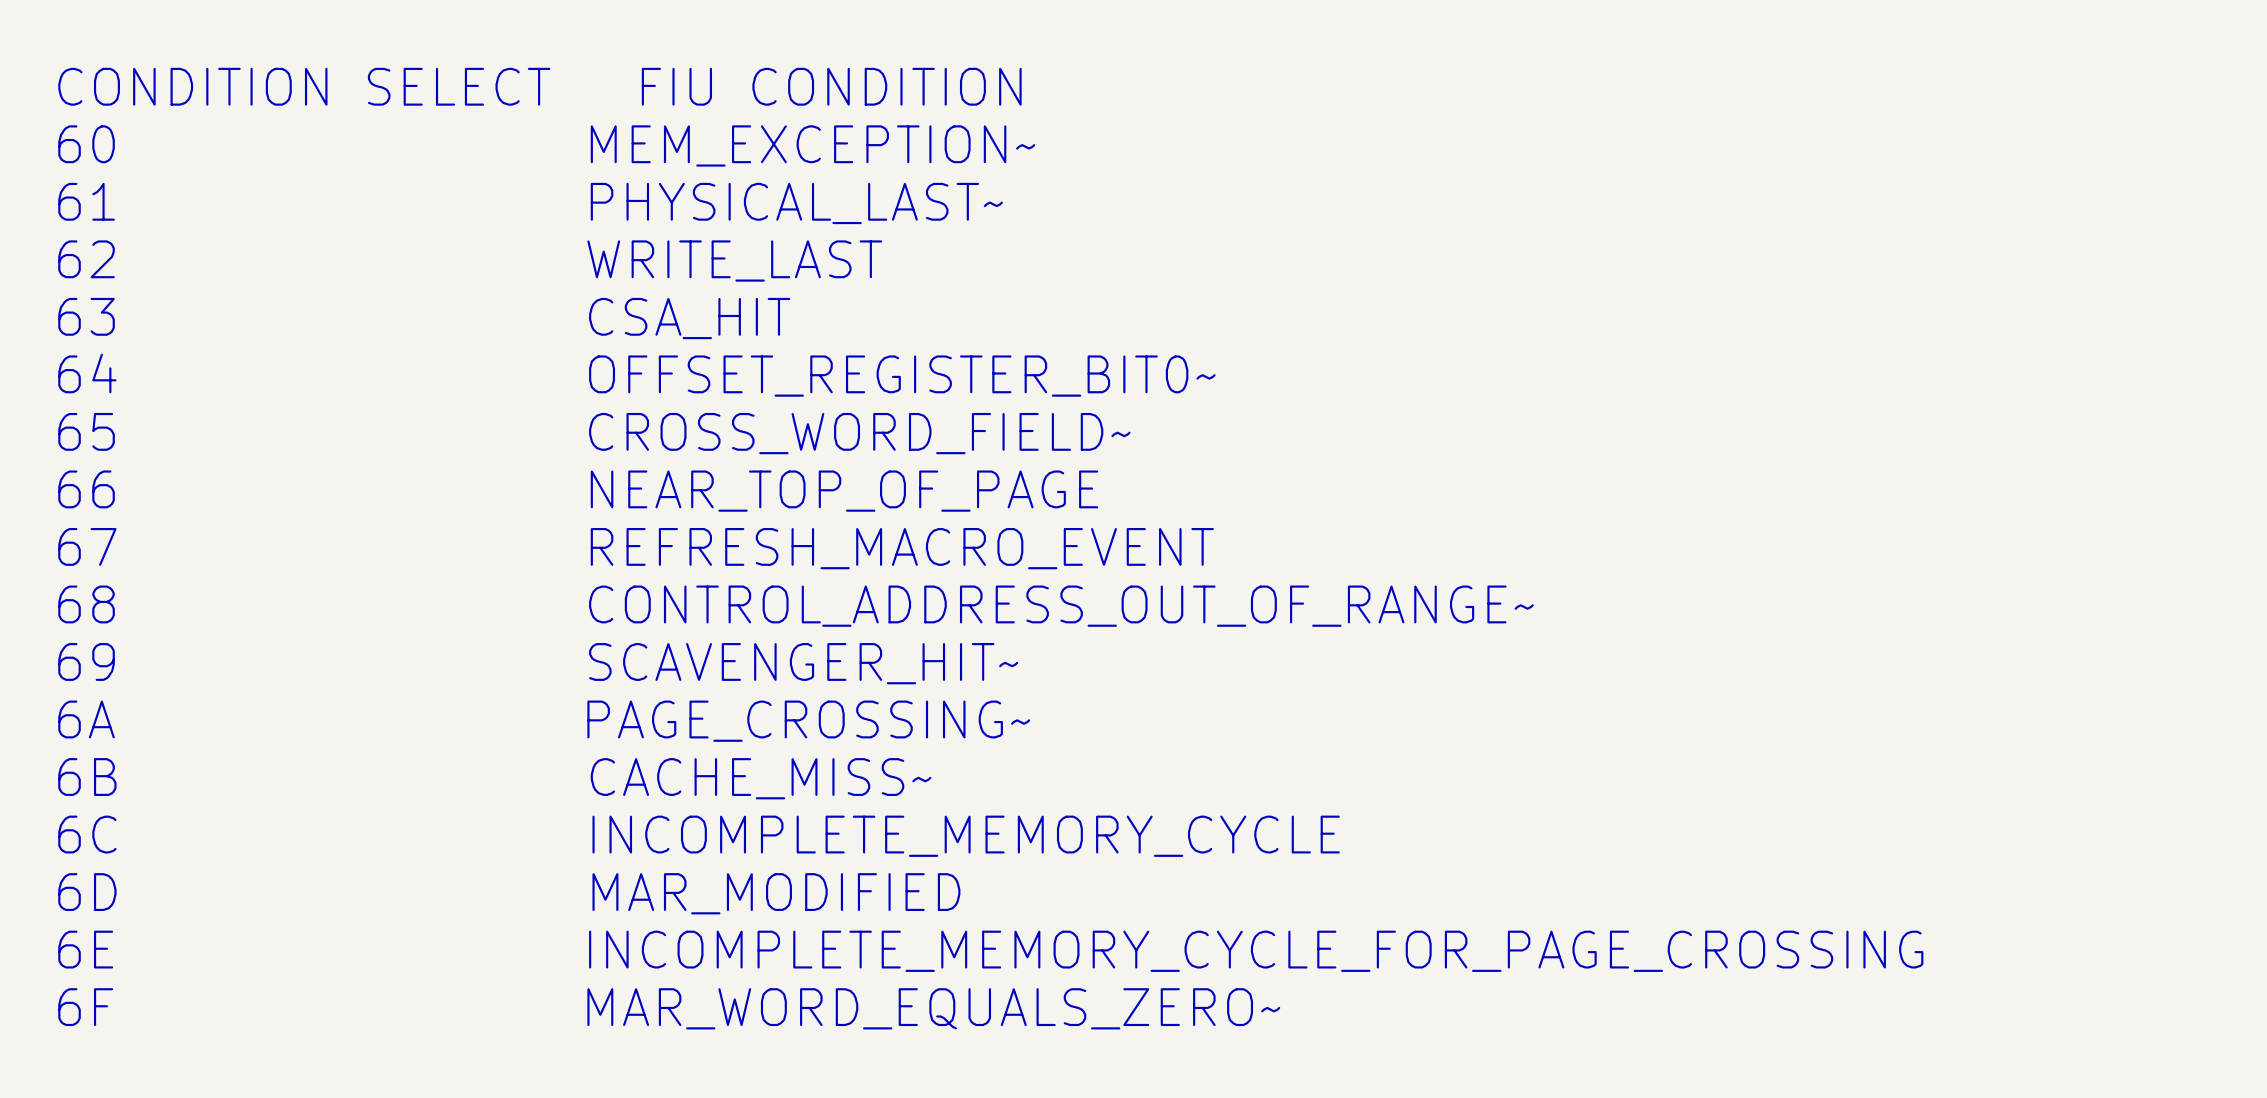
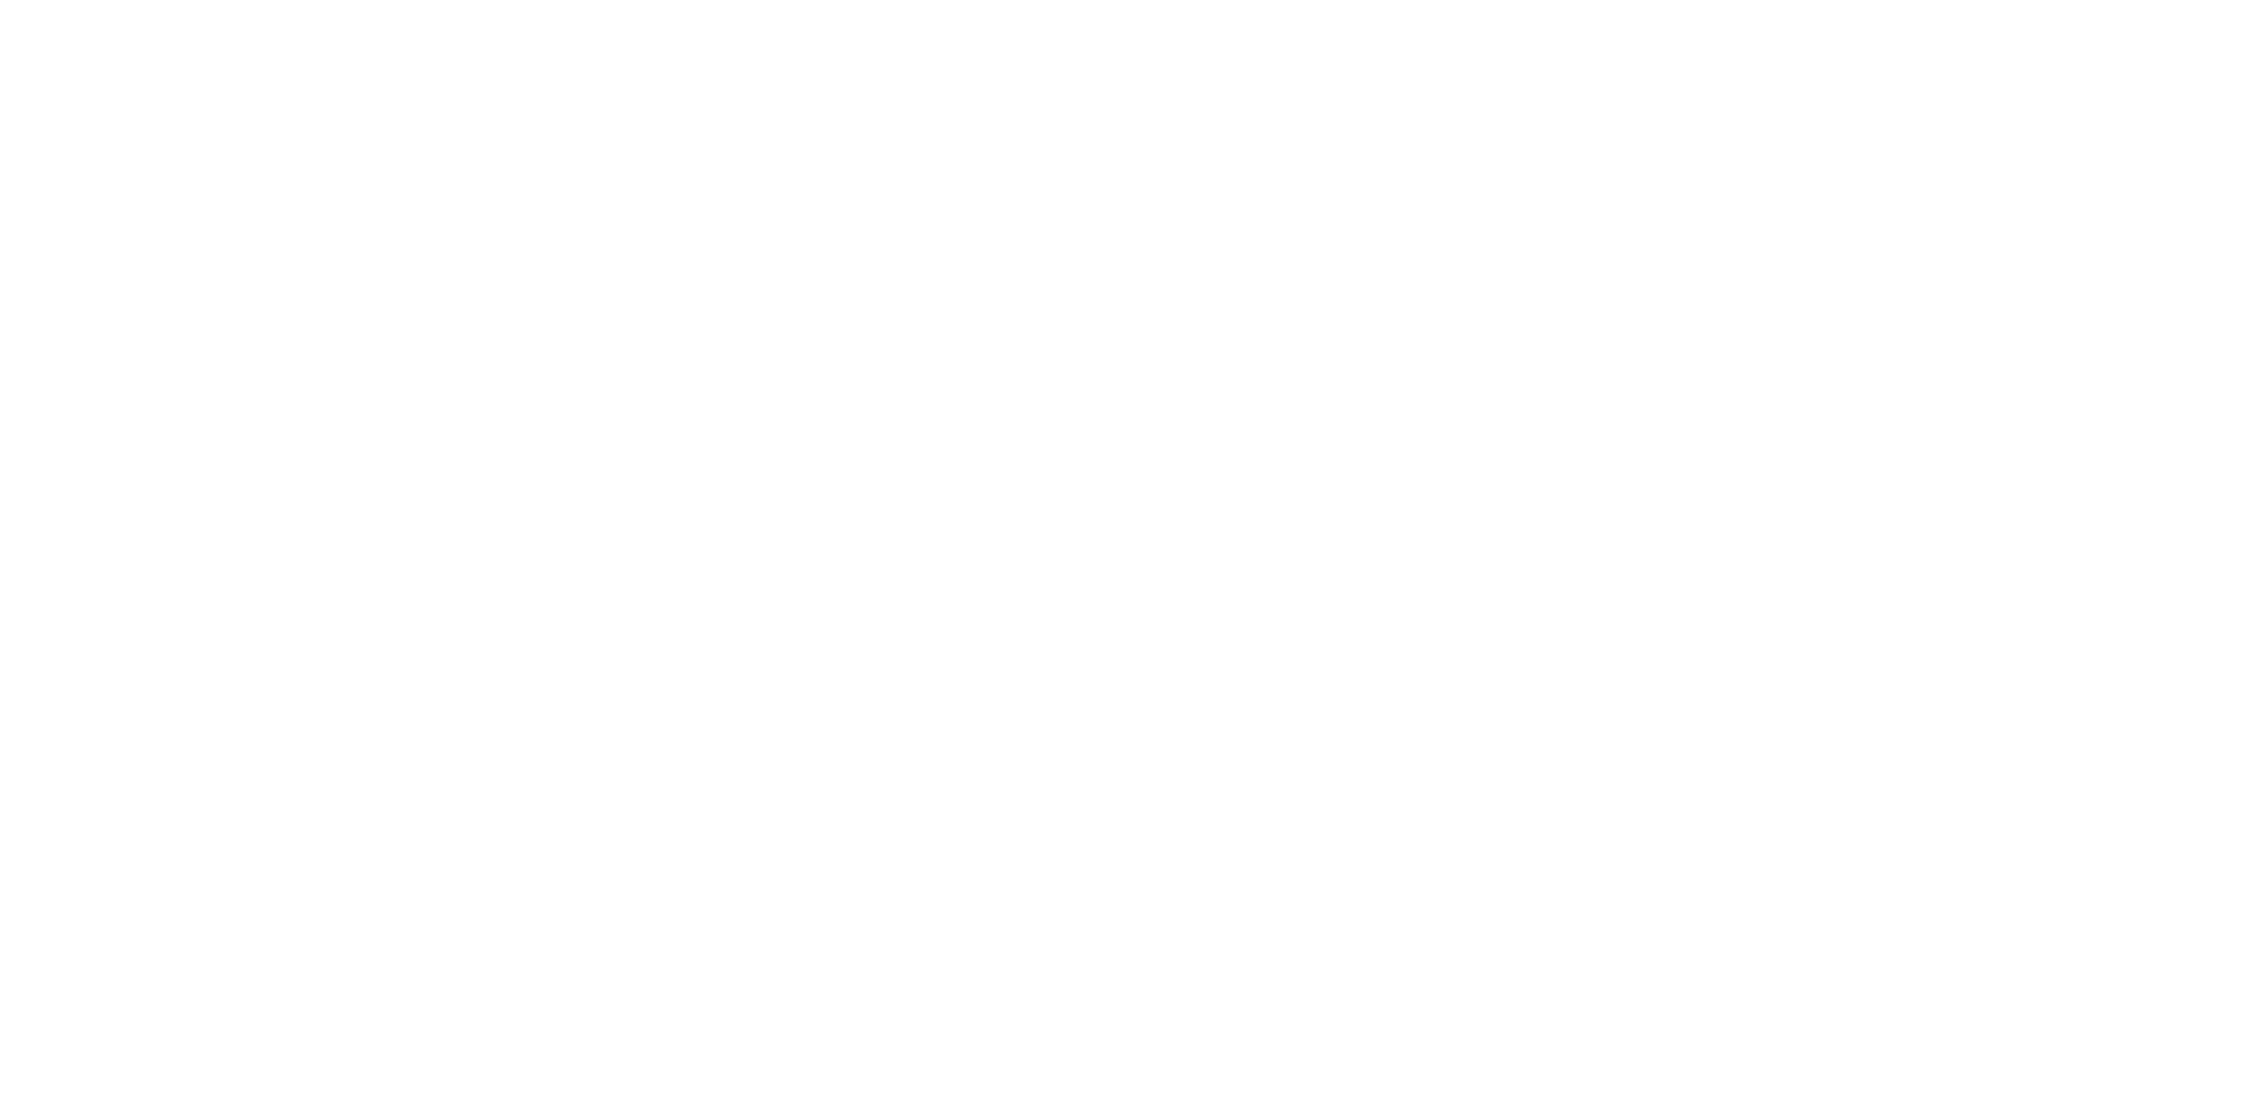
text: CONDITION SELECT FIU CONDITION (539, 86) -> none
text: 60 MEM_EXCEPTION~ (546, 145) -> none
text: 61 PHYSICAL_LAST~ (530, 203) -> none
text: 62 WRITE_LAST (470, 261) -> none
text: 63 CSA_HIT (424, 318) -> none
text: 64 OFFSET_REGISTER_BIT0~ (636, 375) -> none
text: 65 CROSS_WORD_FIELD~ (594, 433) -> none
text: 66 NEAR_TOP_OF_PAGE (578, 491) -> none
text: 67 REFRESH_MACRO_EVENT (636, 548) -> none
text: 68 CONTROL_ADDRESS_OUT_OF_RANGE~ (796, 606) -> none
text: 69 SCAVENGER_HIT~ (538, 663) -> none
text: 6A PAGE_CROSSING~ (544, 721) -> none
text: 6B CACHE_MISS~ (494, 778) -> none
text: 6C INCOMPLETE_MEMORY_CYCLE (699, 836) -> none
text: 6D MAR_MODIFIED (509, 893) -> none
text: 6E INCOMPLETE_MEMORY_CYCLE_FOR_PAGE_CROSSING (990, 951) -> none
text: 6F MAR_WORD_EQUALS_ZERO~ (669, 1008) -> none

